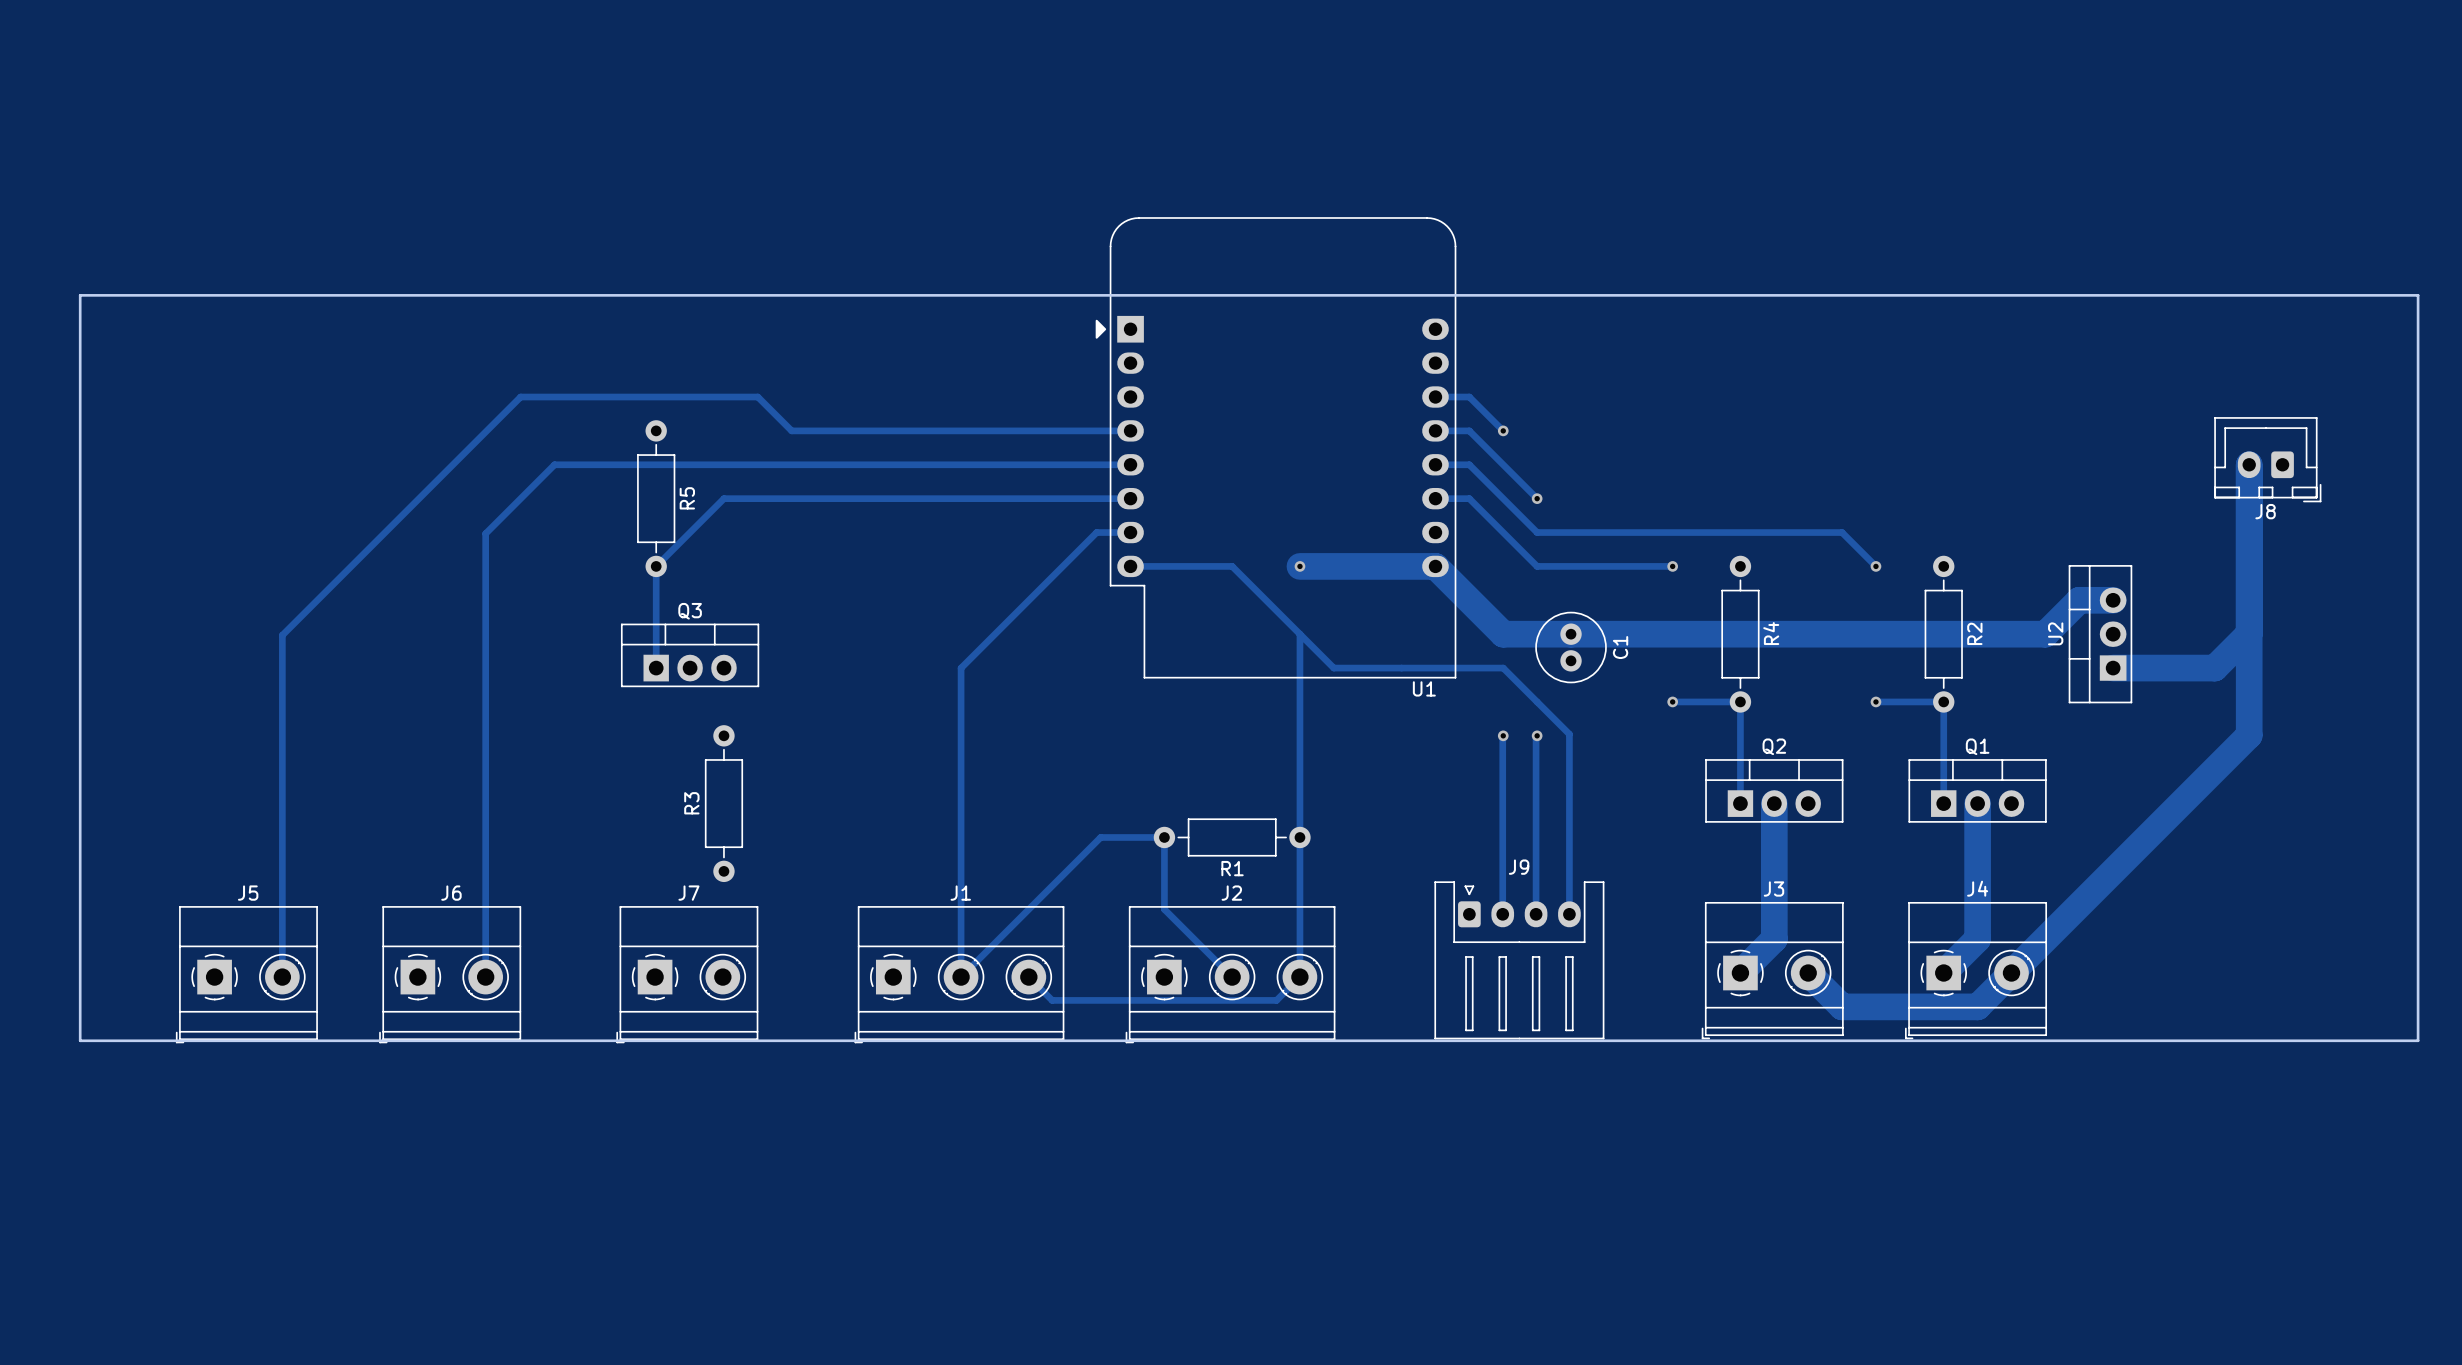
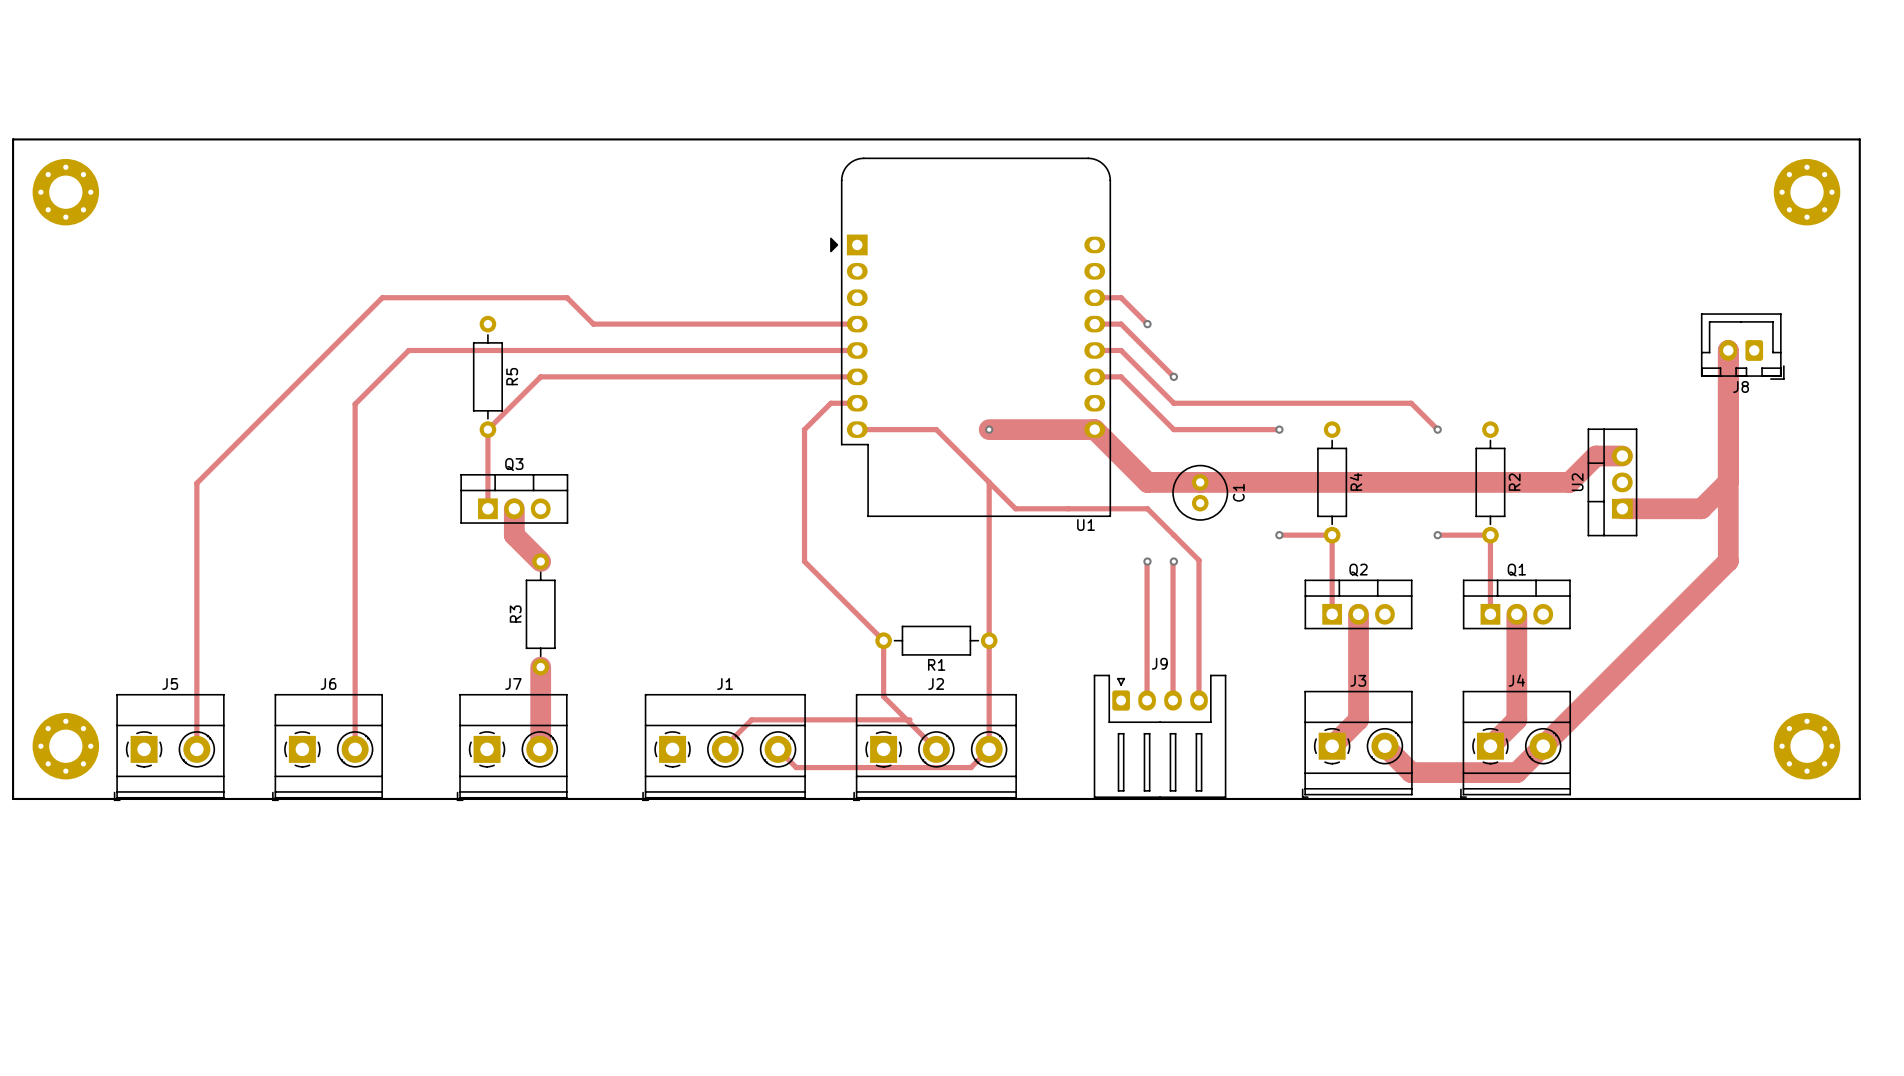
part: none -> (65, 192)
part: none -> (1807, 192)
board edge: (2418, 295) (80, 295) (80, 1040) -> (1859, 218) (1859, 139) (13, 139) (13, 798) (39, 798)
track: (1062, 566) (961, 668) (961, 977) (1100, 837) (1164, 837) -> (804, 429) (804, 561) (883, 640)
track: none -> (514, 508) (514, 535) (540, 561)
track: none -> (540, 667) (540, 746)
track: none -> (909, 719) (751, 719) (725, 746)
part: none -> (65, 746)
part: none -> (1807, 746)

